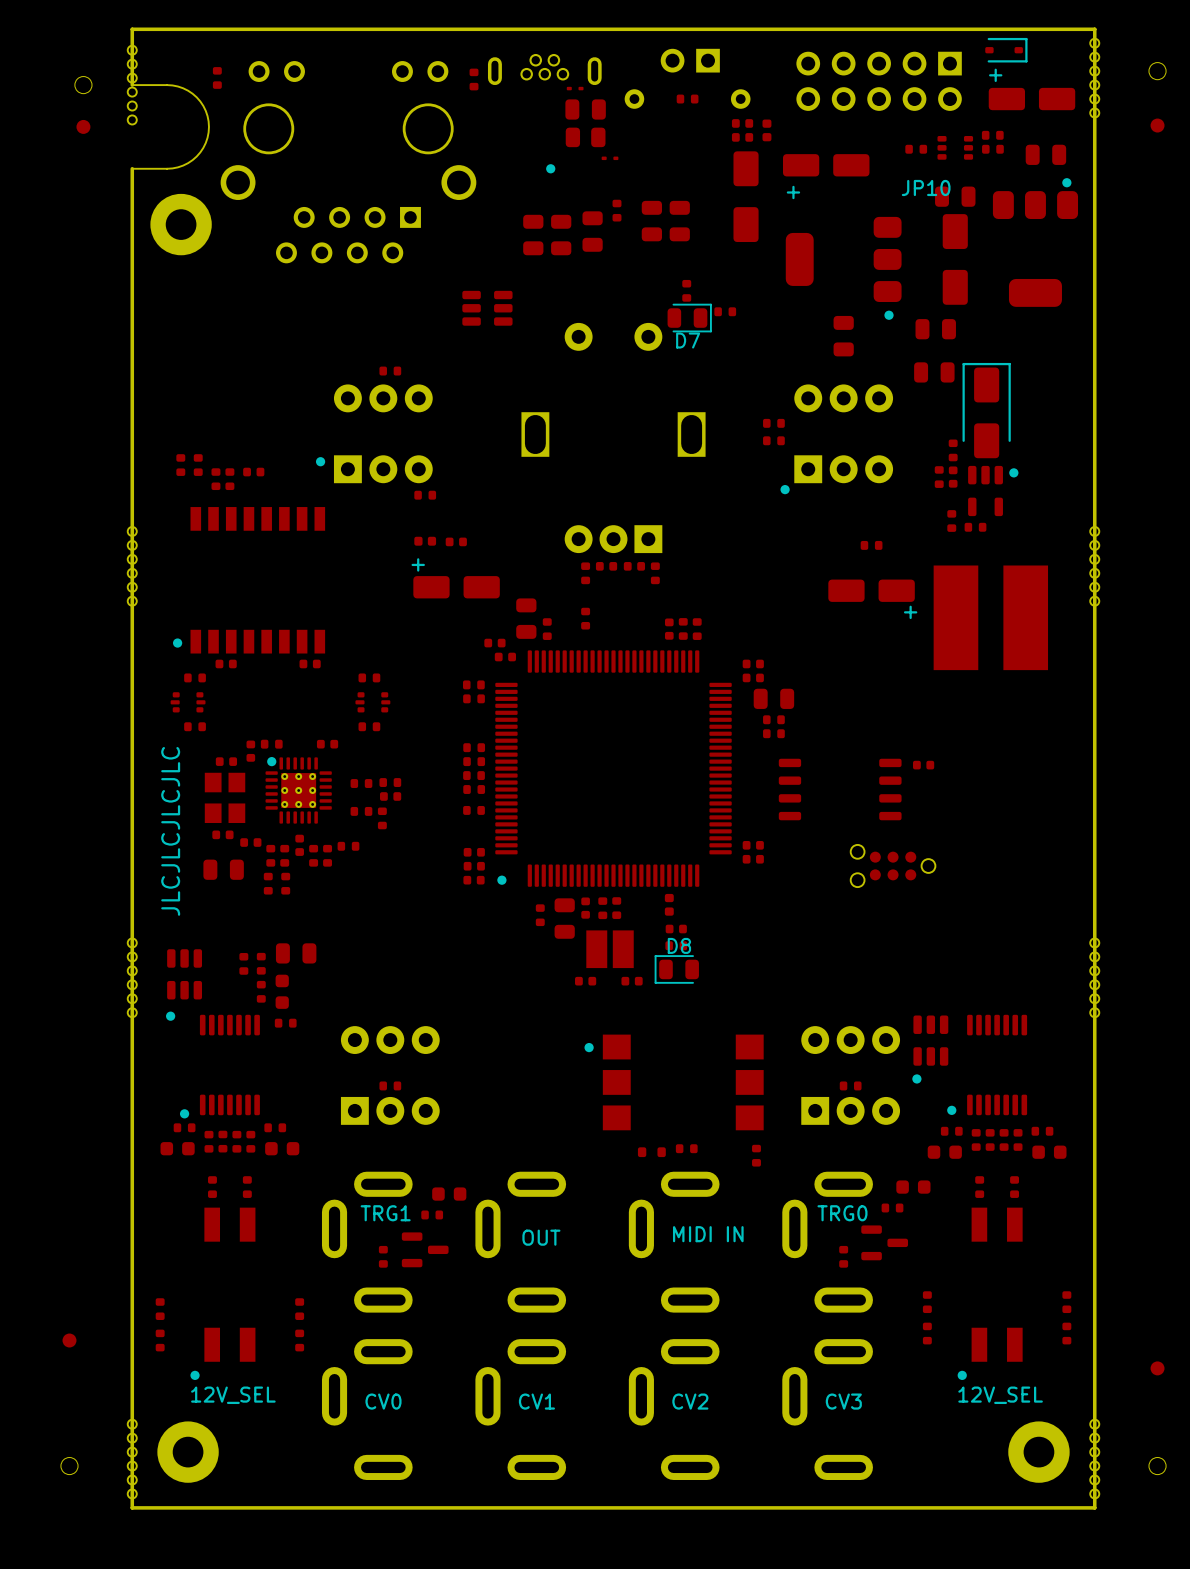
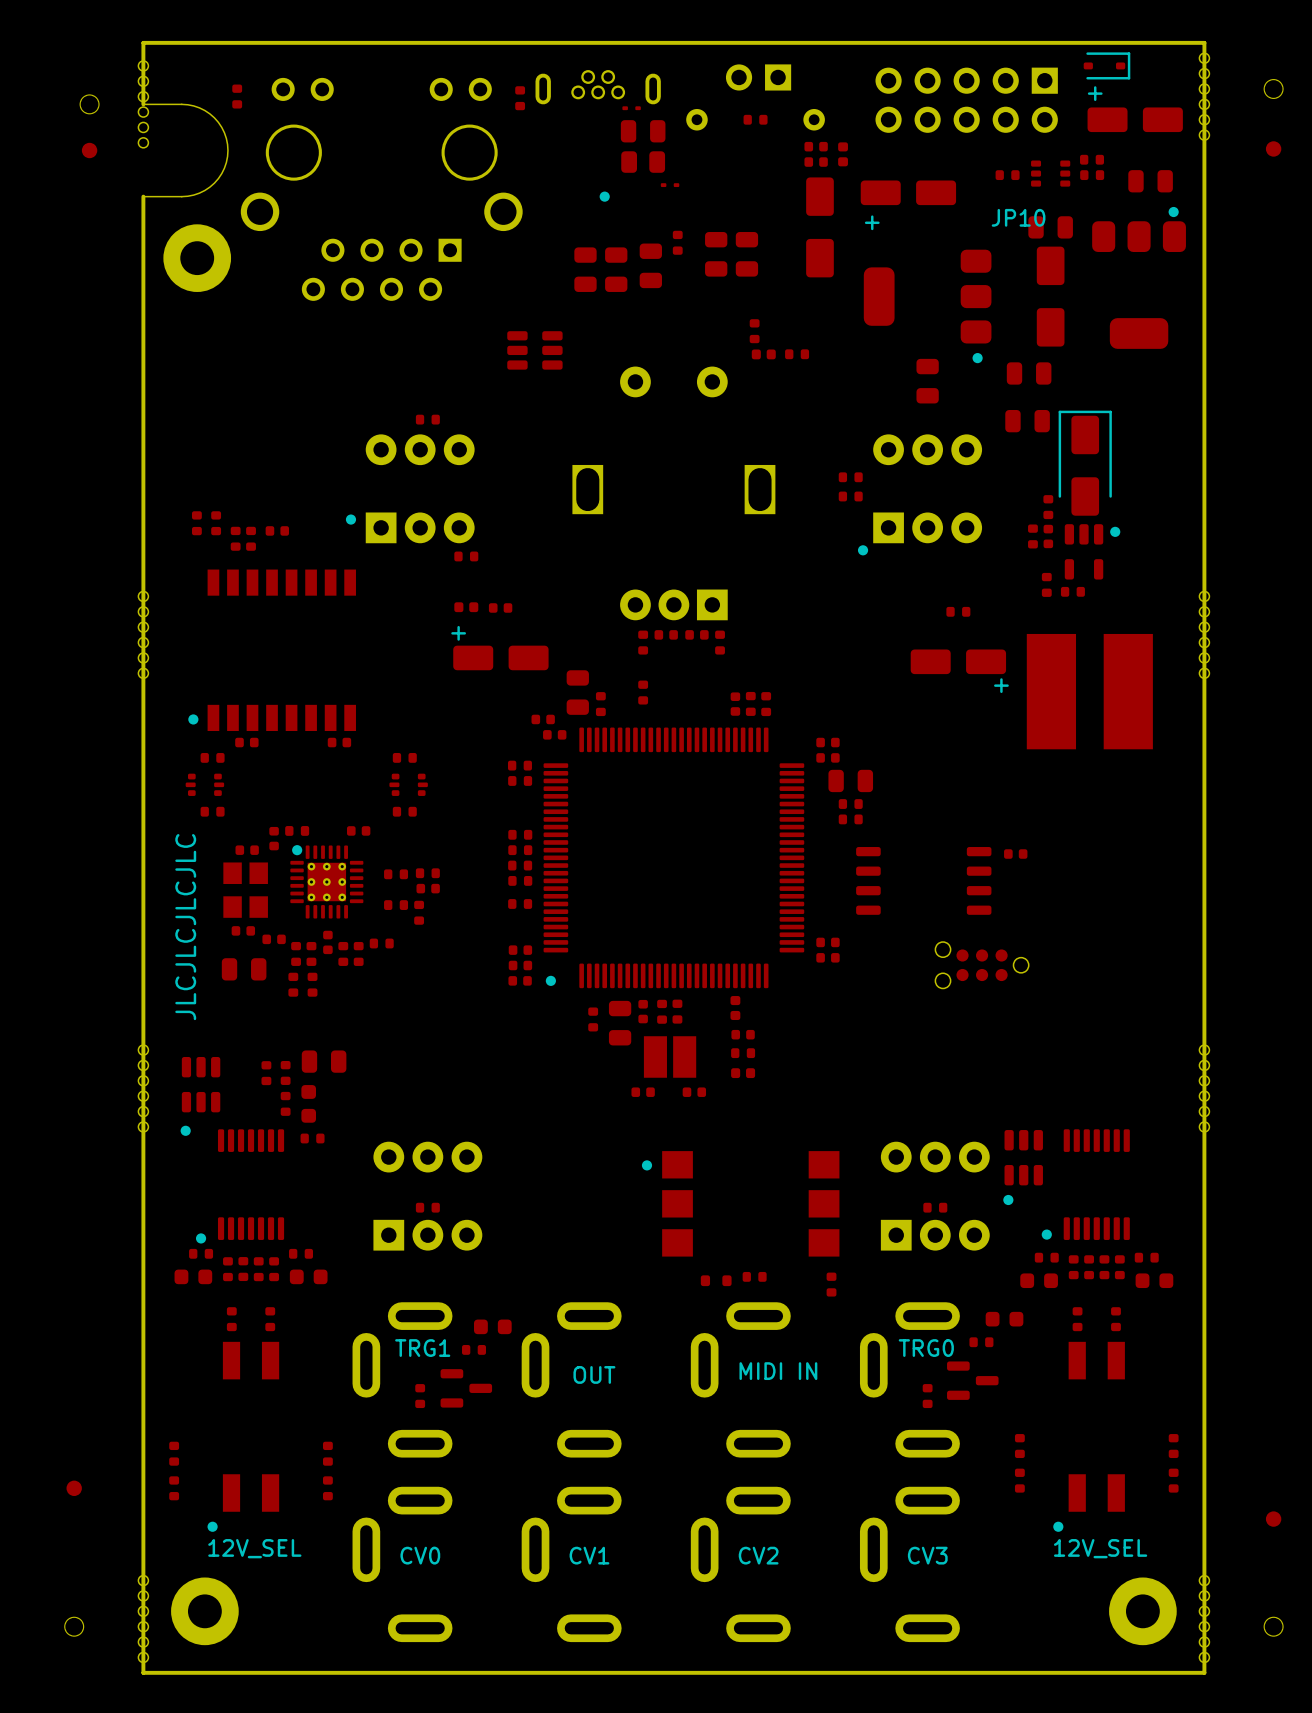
part: none -> (763, 354)
D7: (689, 318) -> none
part: none -> (743, 1073)
D8: (676, 969) -> none

